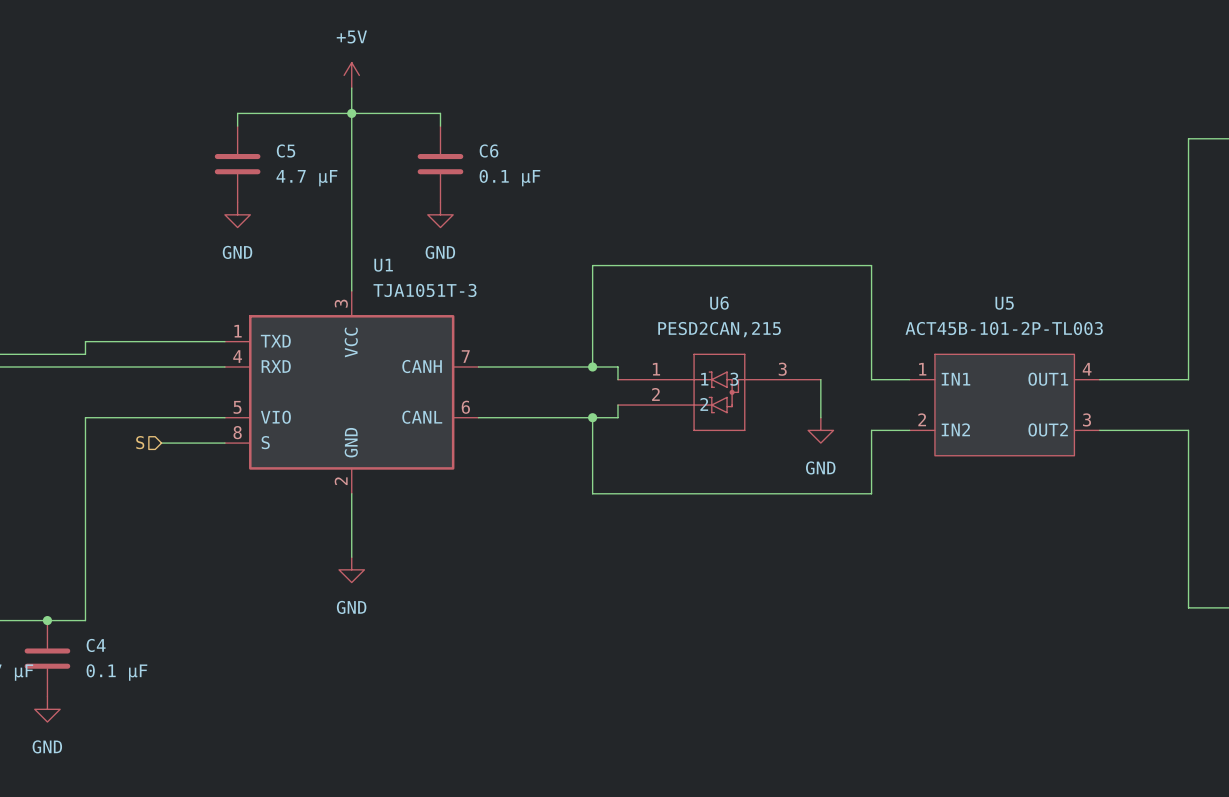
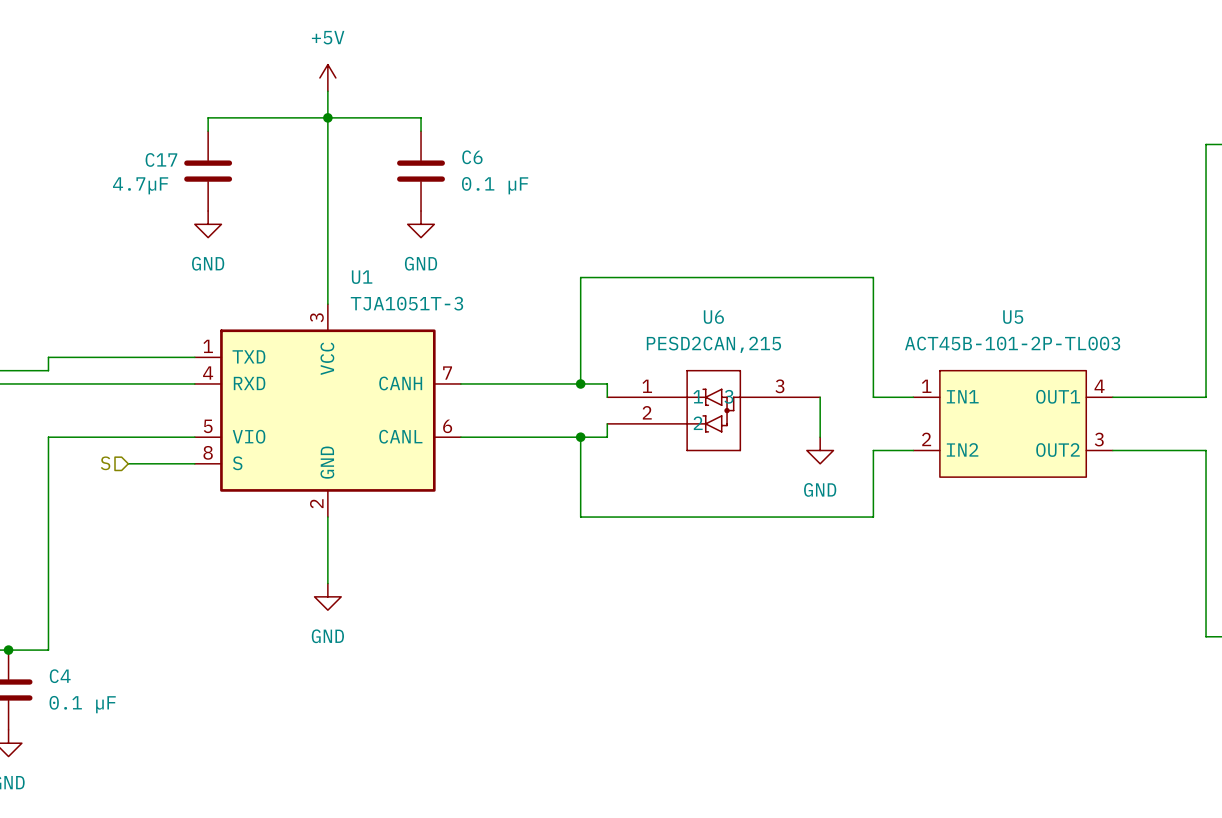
C5 name: C5 (286, 150) -> C17 (161, 159)
C5 value: 4.7 µF (306, 178) -> 4.7µF (140, 185)

